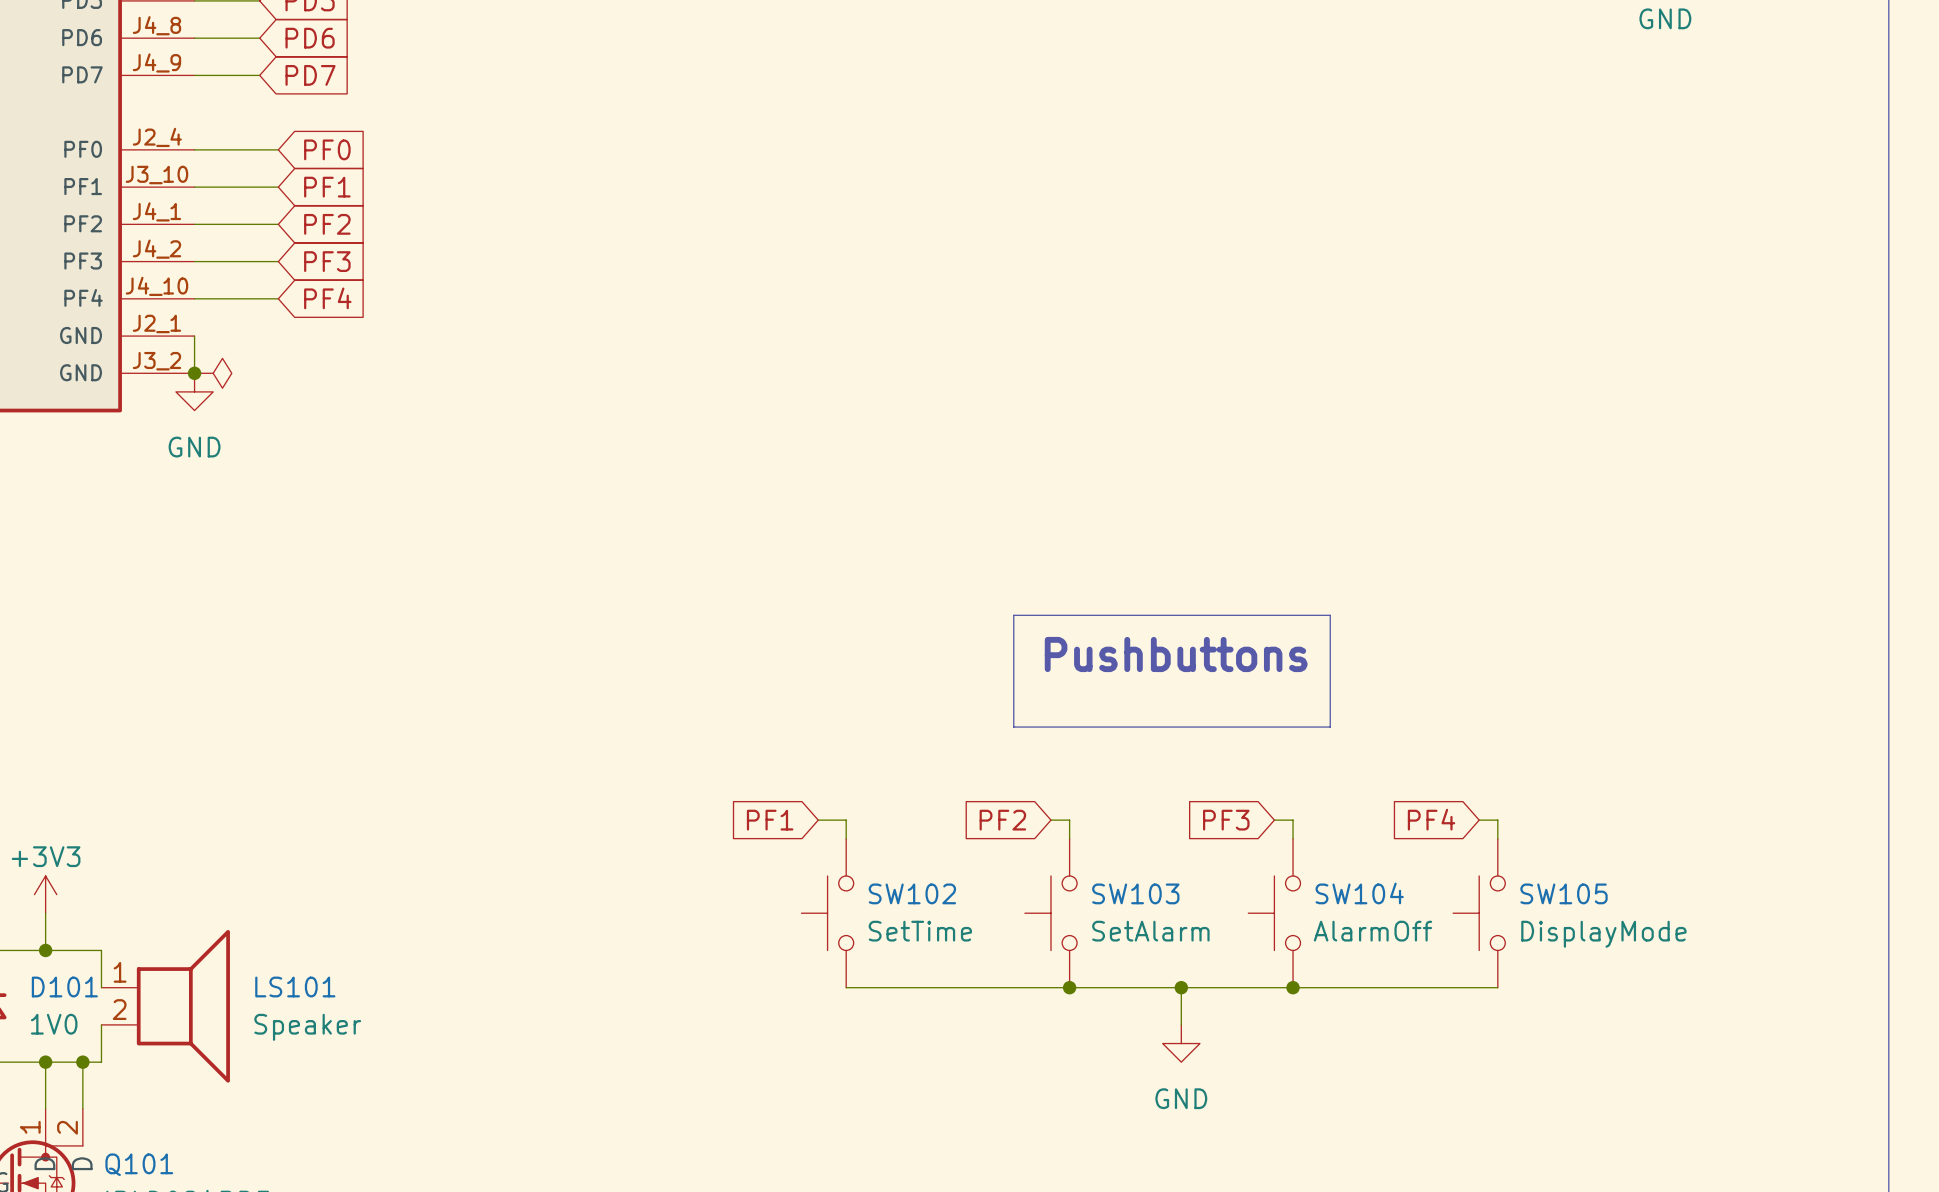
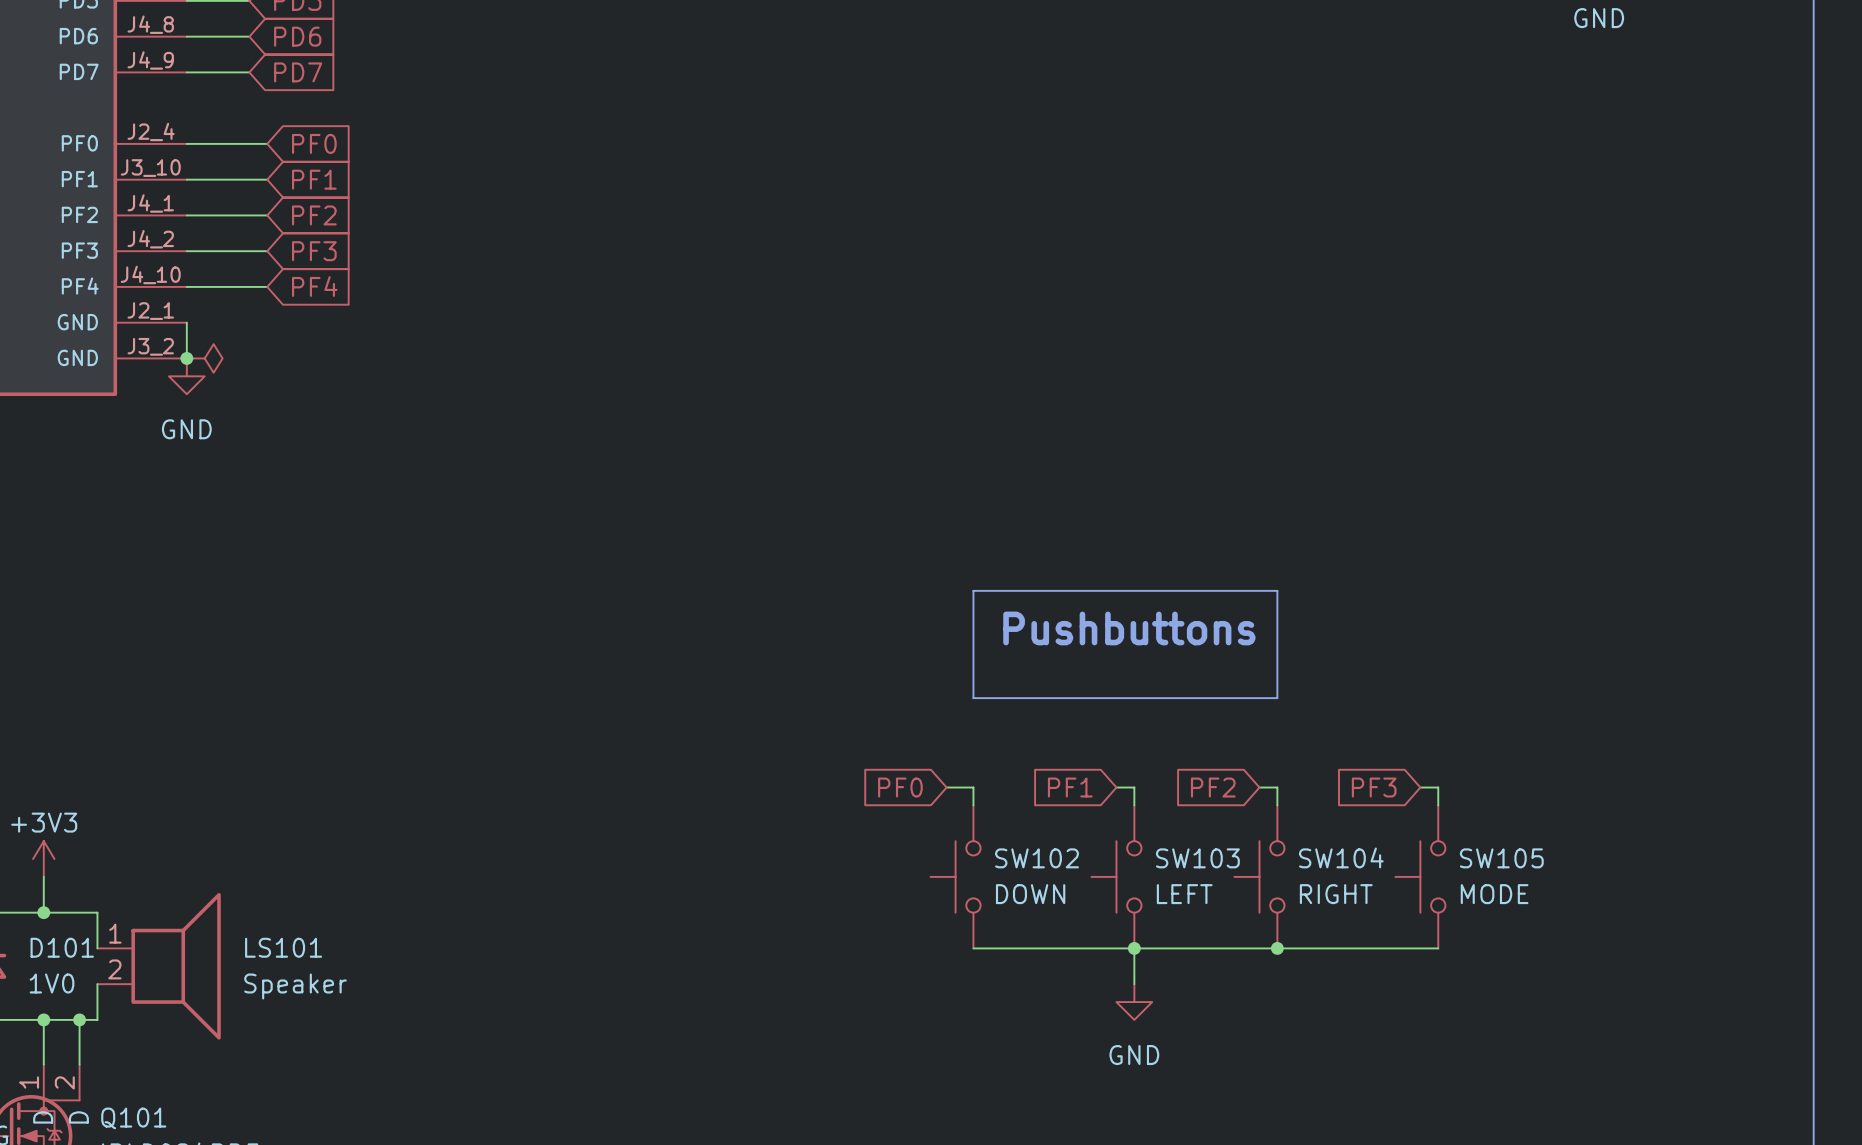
global label: PF4 (1431, 819) -> PF3 (1374, 787)
global label position: PF1 (770, 820) -> PF1 (1070, 787)
wire: (818, 820) (846, 820) (846, 838) -> (946, 787) (973, 787) (973, 805)
global label: none -> PF0 (900, 787)
global label position: PF2 (1002, 820) -> PF2 (1213, 787)
wire: (1050, 820) (1069, 820) (1069, 838) -> (1116, 787) (1134, 787) (1134, 805)
global label: PF3 (1226, 820) -> none
wire: (1274, 820) (1293, 820) (1293, 838) -> (1259, 787) (1277, 787) (1277, 805)
SW102 position: (827, 913) -> (955, 876)
SW103 position: (1050, 913) -> (1116, 876)
SW104 position: (1274, 913) -> (1259, 876)
SW102 value: SetTime (920, 931) -> DOWN (1030, 894)
SW103 value: SetAlarm (1150, 931) -> LEFT (1184, 894)
SW104 value: AlarmOff (1372, 931) -> RIGHT (1336, 894)
SW105 value: DisplayMode (1603, 934) -> MODE (1494, 894)
wire: (846, 987) (1013, 987) -> none
junction: (1069, 987) -> none
junction position: (1293, 987) -> (1277, 948)

